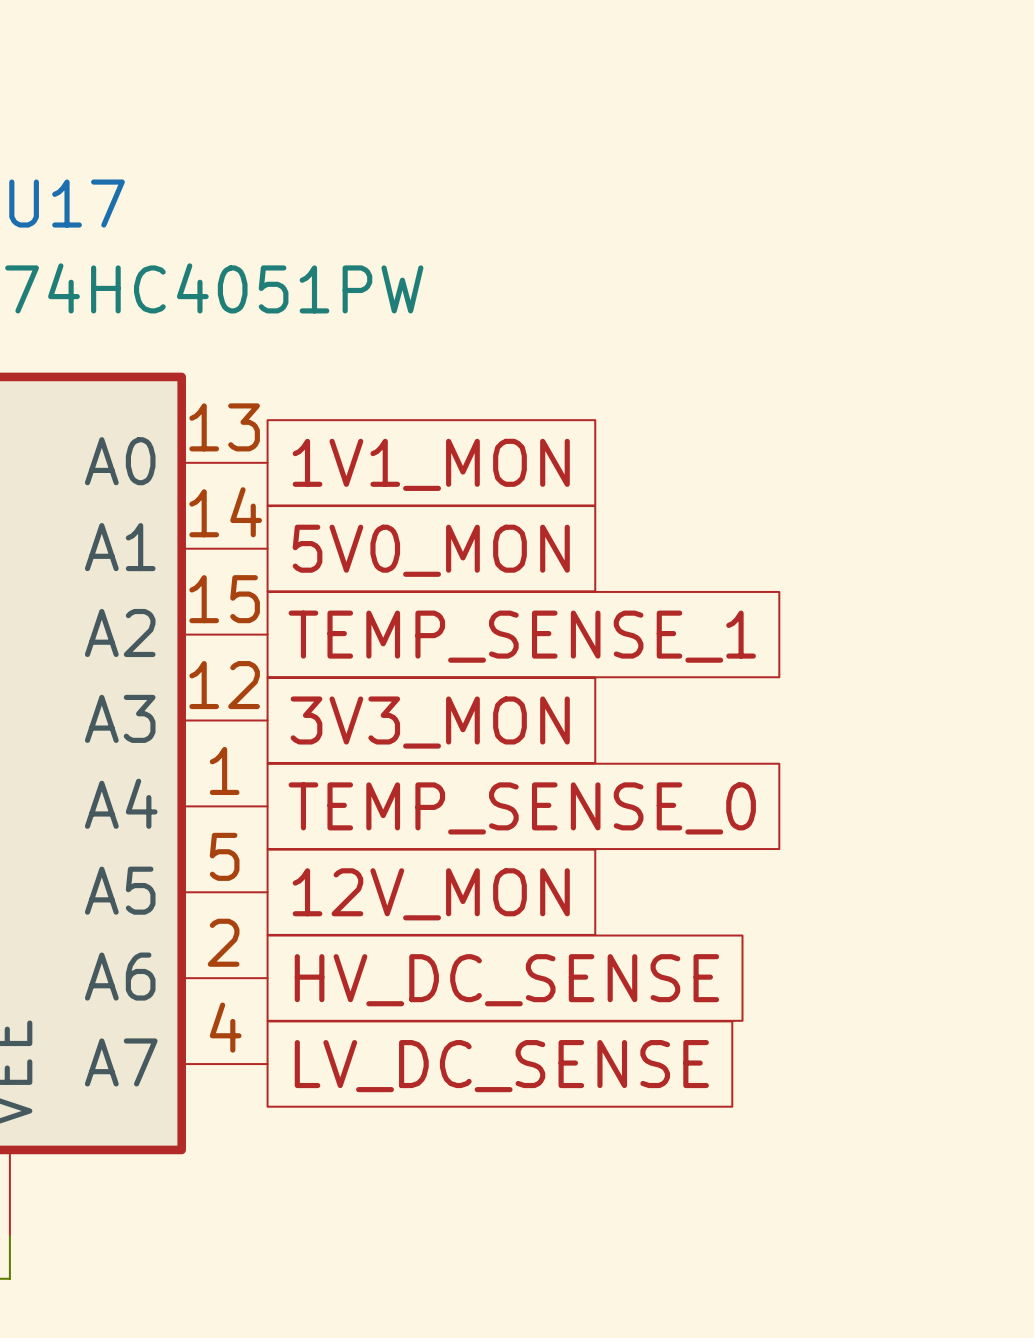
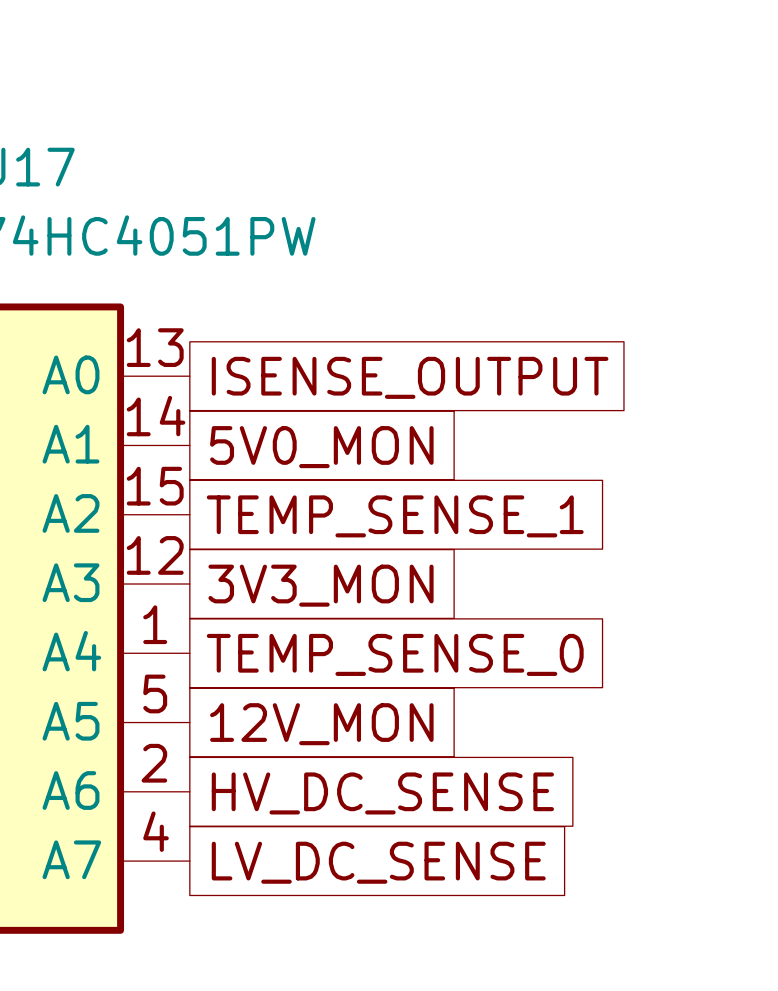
global label: 1V1_MON (431, 464) -> ISENSE_OUTPUT (410, 377)

